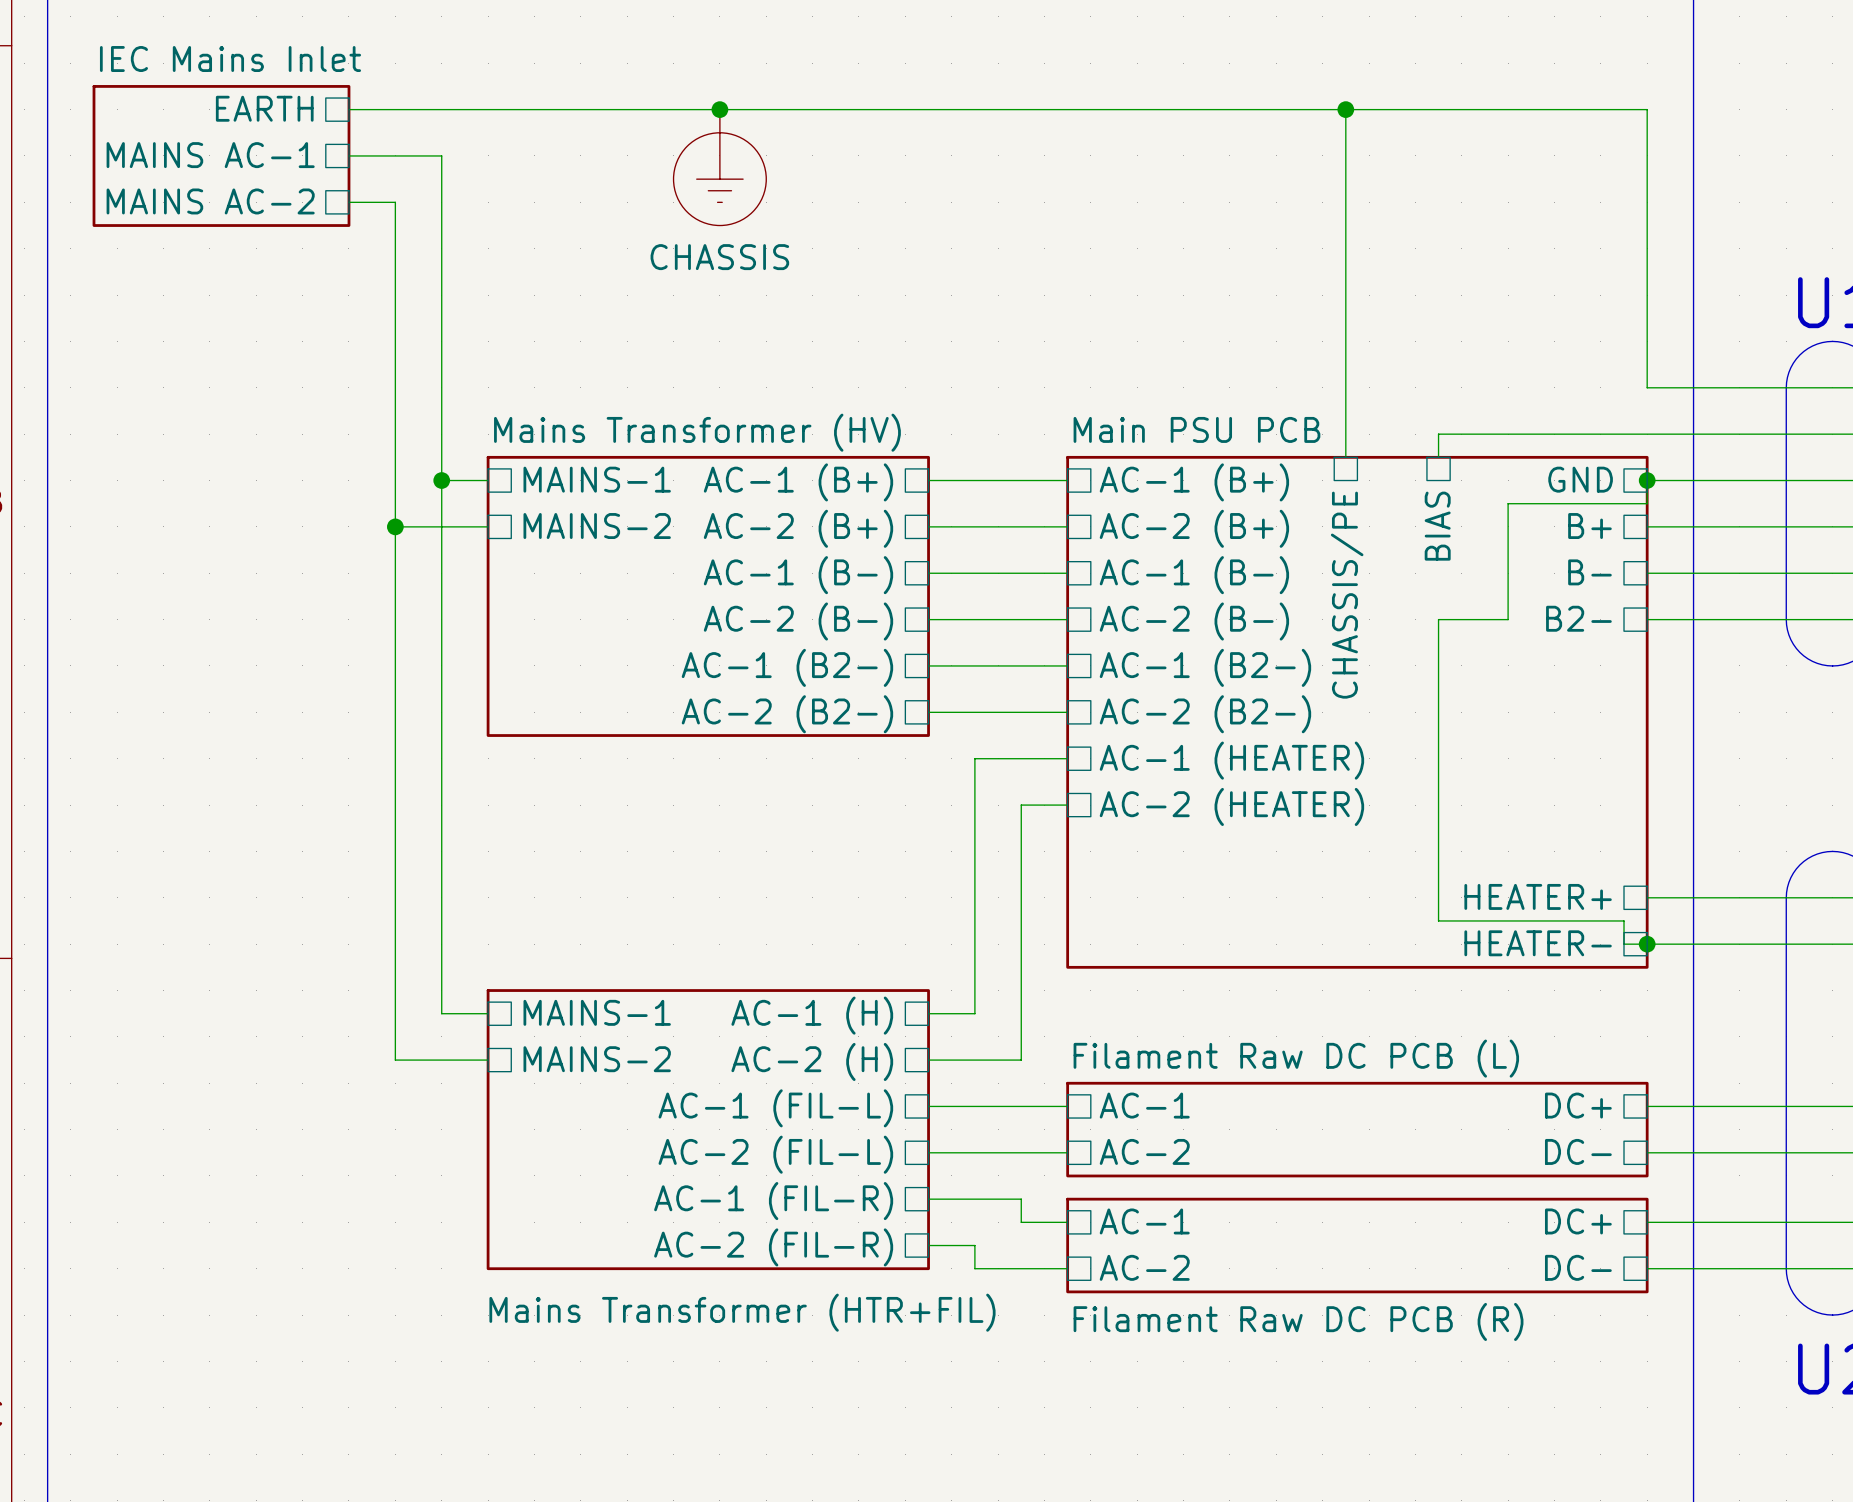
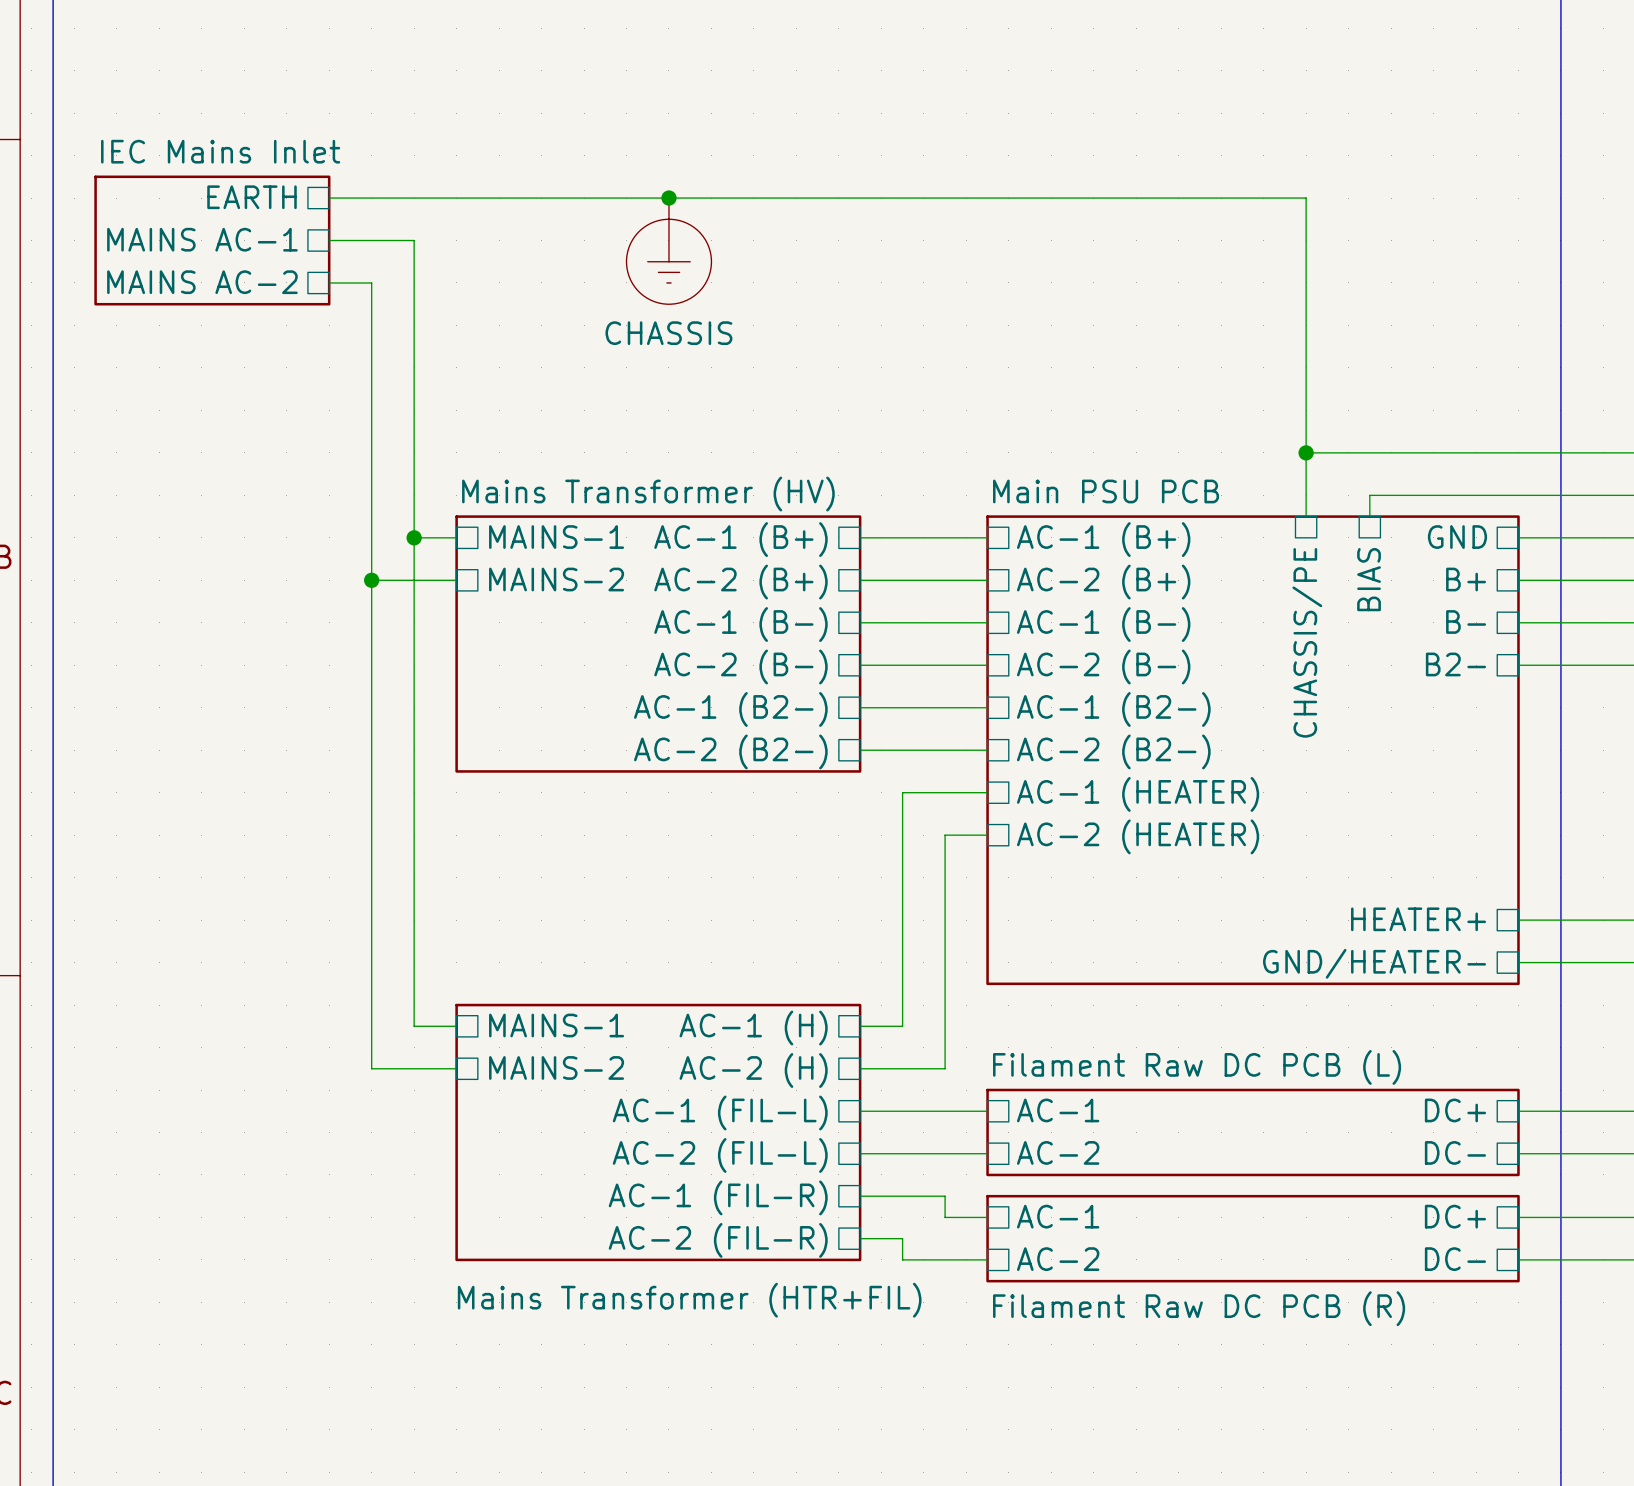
wire: (1345, 109) (1345, 457) -> none
junction: (1345, 109) -> none
wire: (1415, 109) (1647, 109) (1647, 387) -> (1306, 198) (1306, 516)
wire: none -> (1306, 452) (1518, 452)
junction: none -> (1306, 452)
wire: (1484, 434) (1438, 434) (1438, 457) -> (1369, 495) (1369, 516)
wire: (1647, 480) (1647, 503) (1508, 503) (1508, 619) (1438, 619) (1438, 920) (1624, 920) (1624, 944) (1647, 944) -> none
junction: (1647, 480) -> none
sheet pin position: BIAS (1437, 526) -> BIAS (1369, 579)
sheet pin position: CHASSIS/PE (1347, 595) -> CHASSIS/PE (1307, 642)
sheet pin: HEATER- (1538, 943) -> GND/HEATER- (1374, 963)
junction: (1647, 944) -> none

